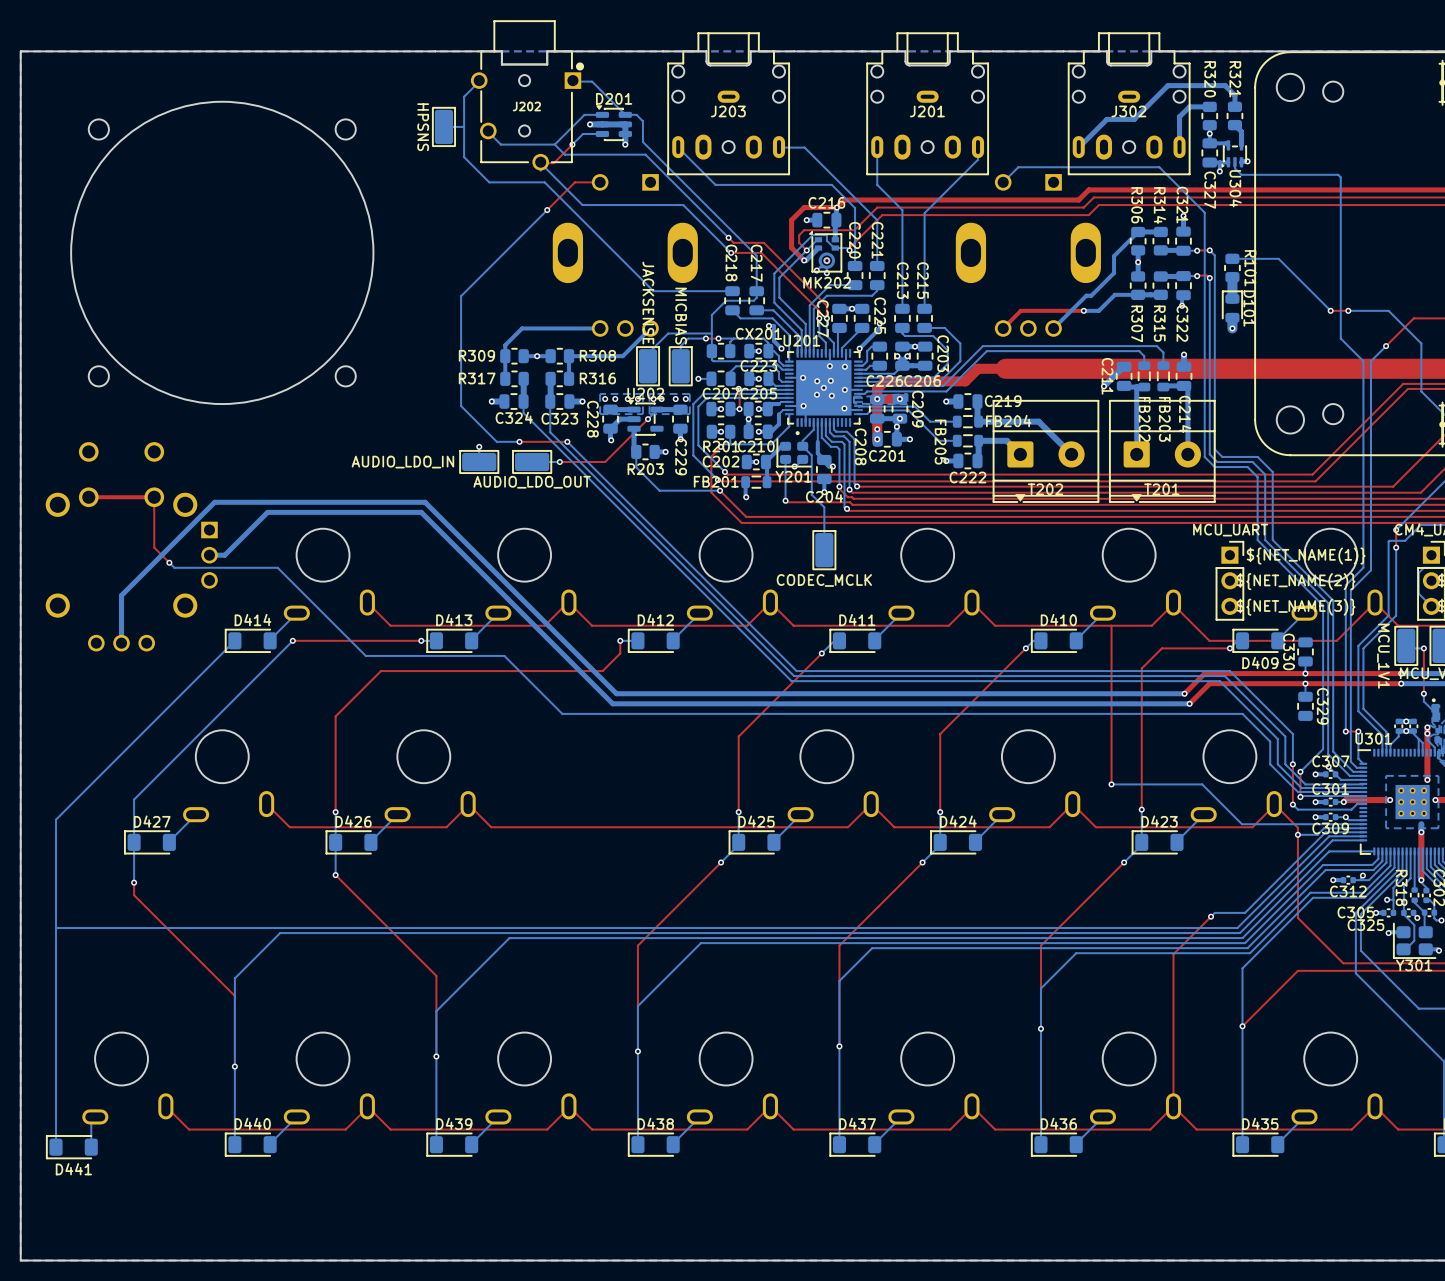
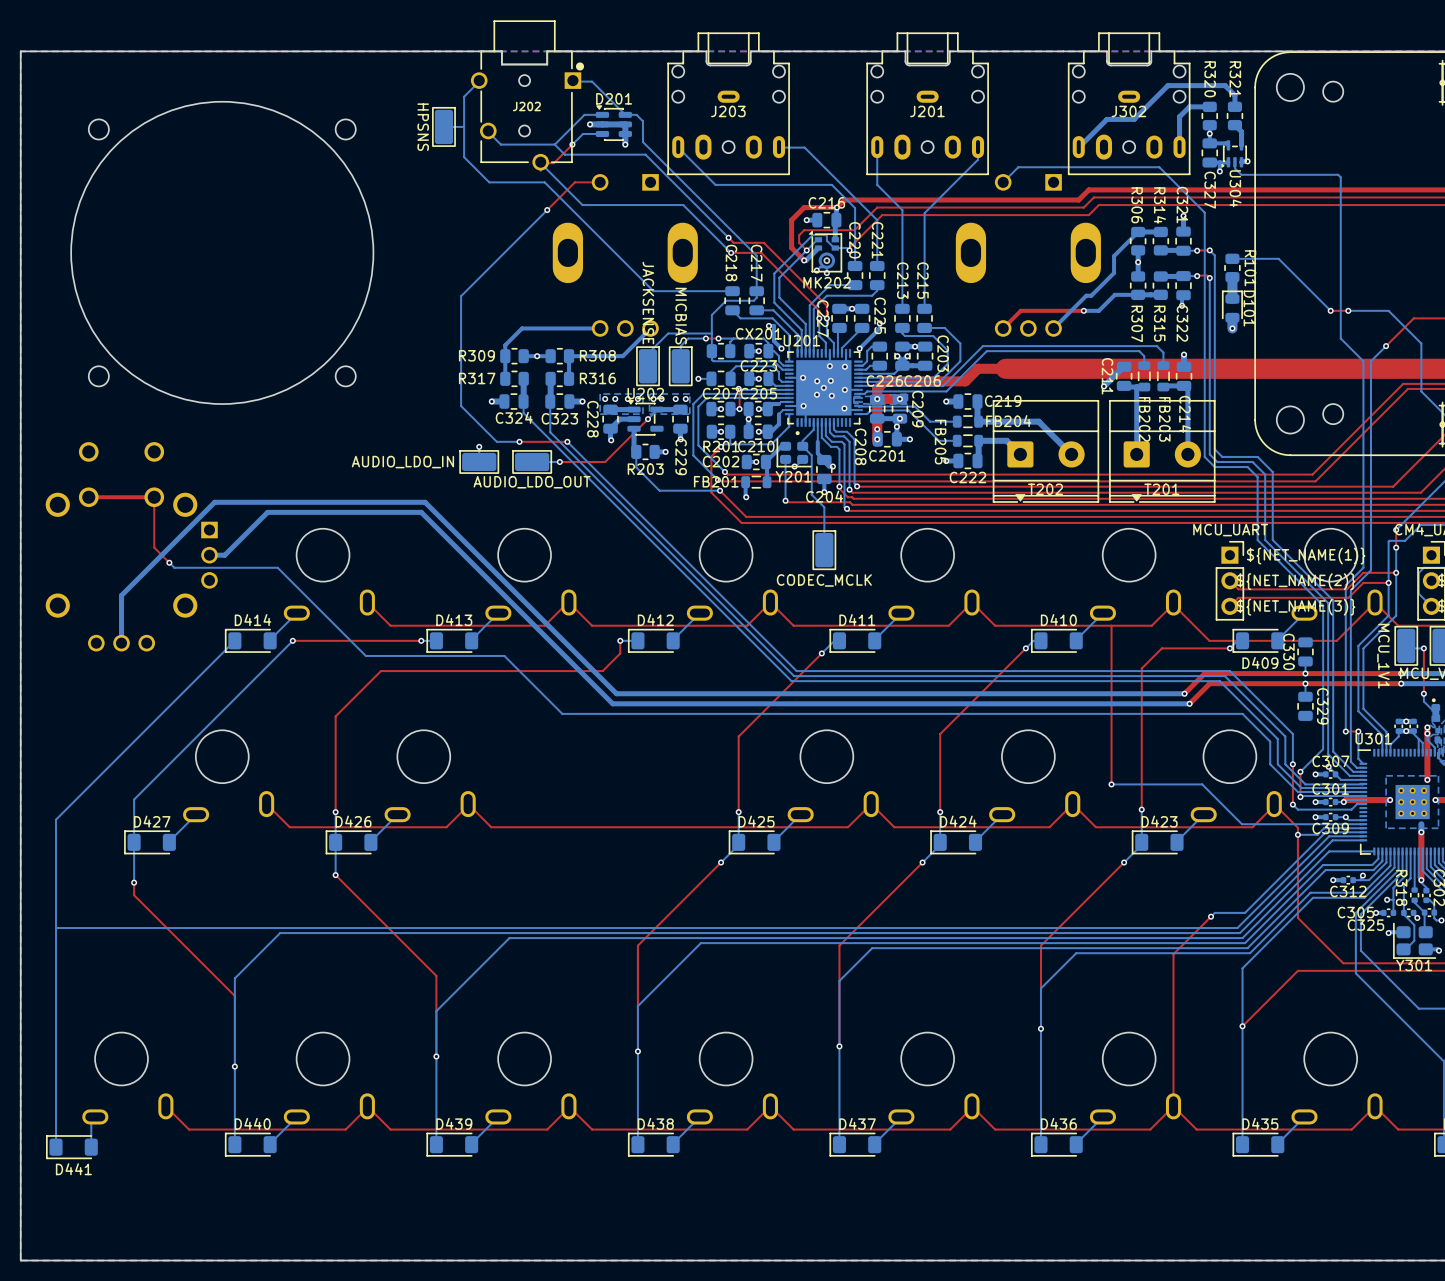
top track: none -> (1396, 572) (1363, 572) (1346, 589) (1238, 589) (1229, 580)
via: none -> (1396, 572)
top track: none -> (1388, 582) (1363, 582) (1348, 597) (1238, 597) (1229, 606)
via: none -> (1388, 582)

